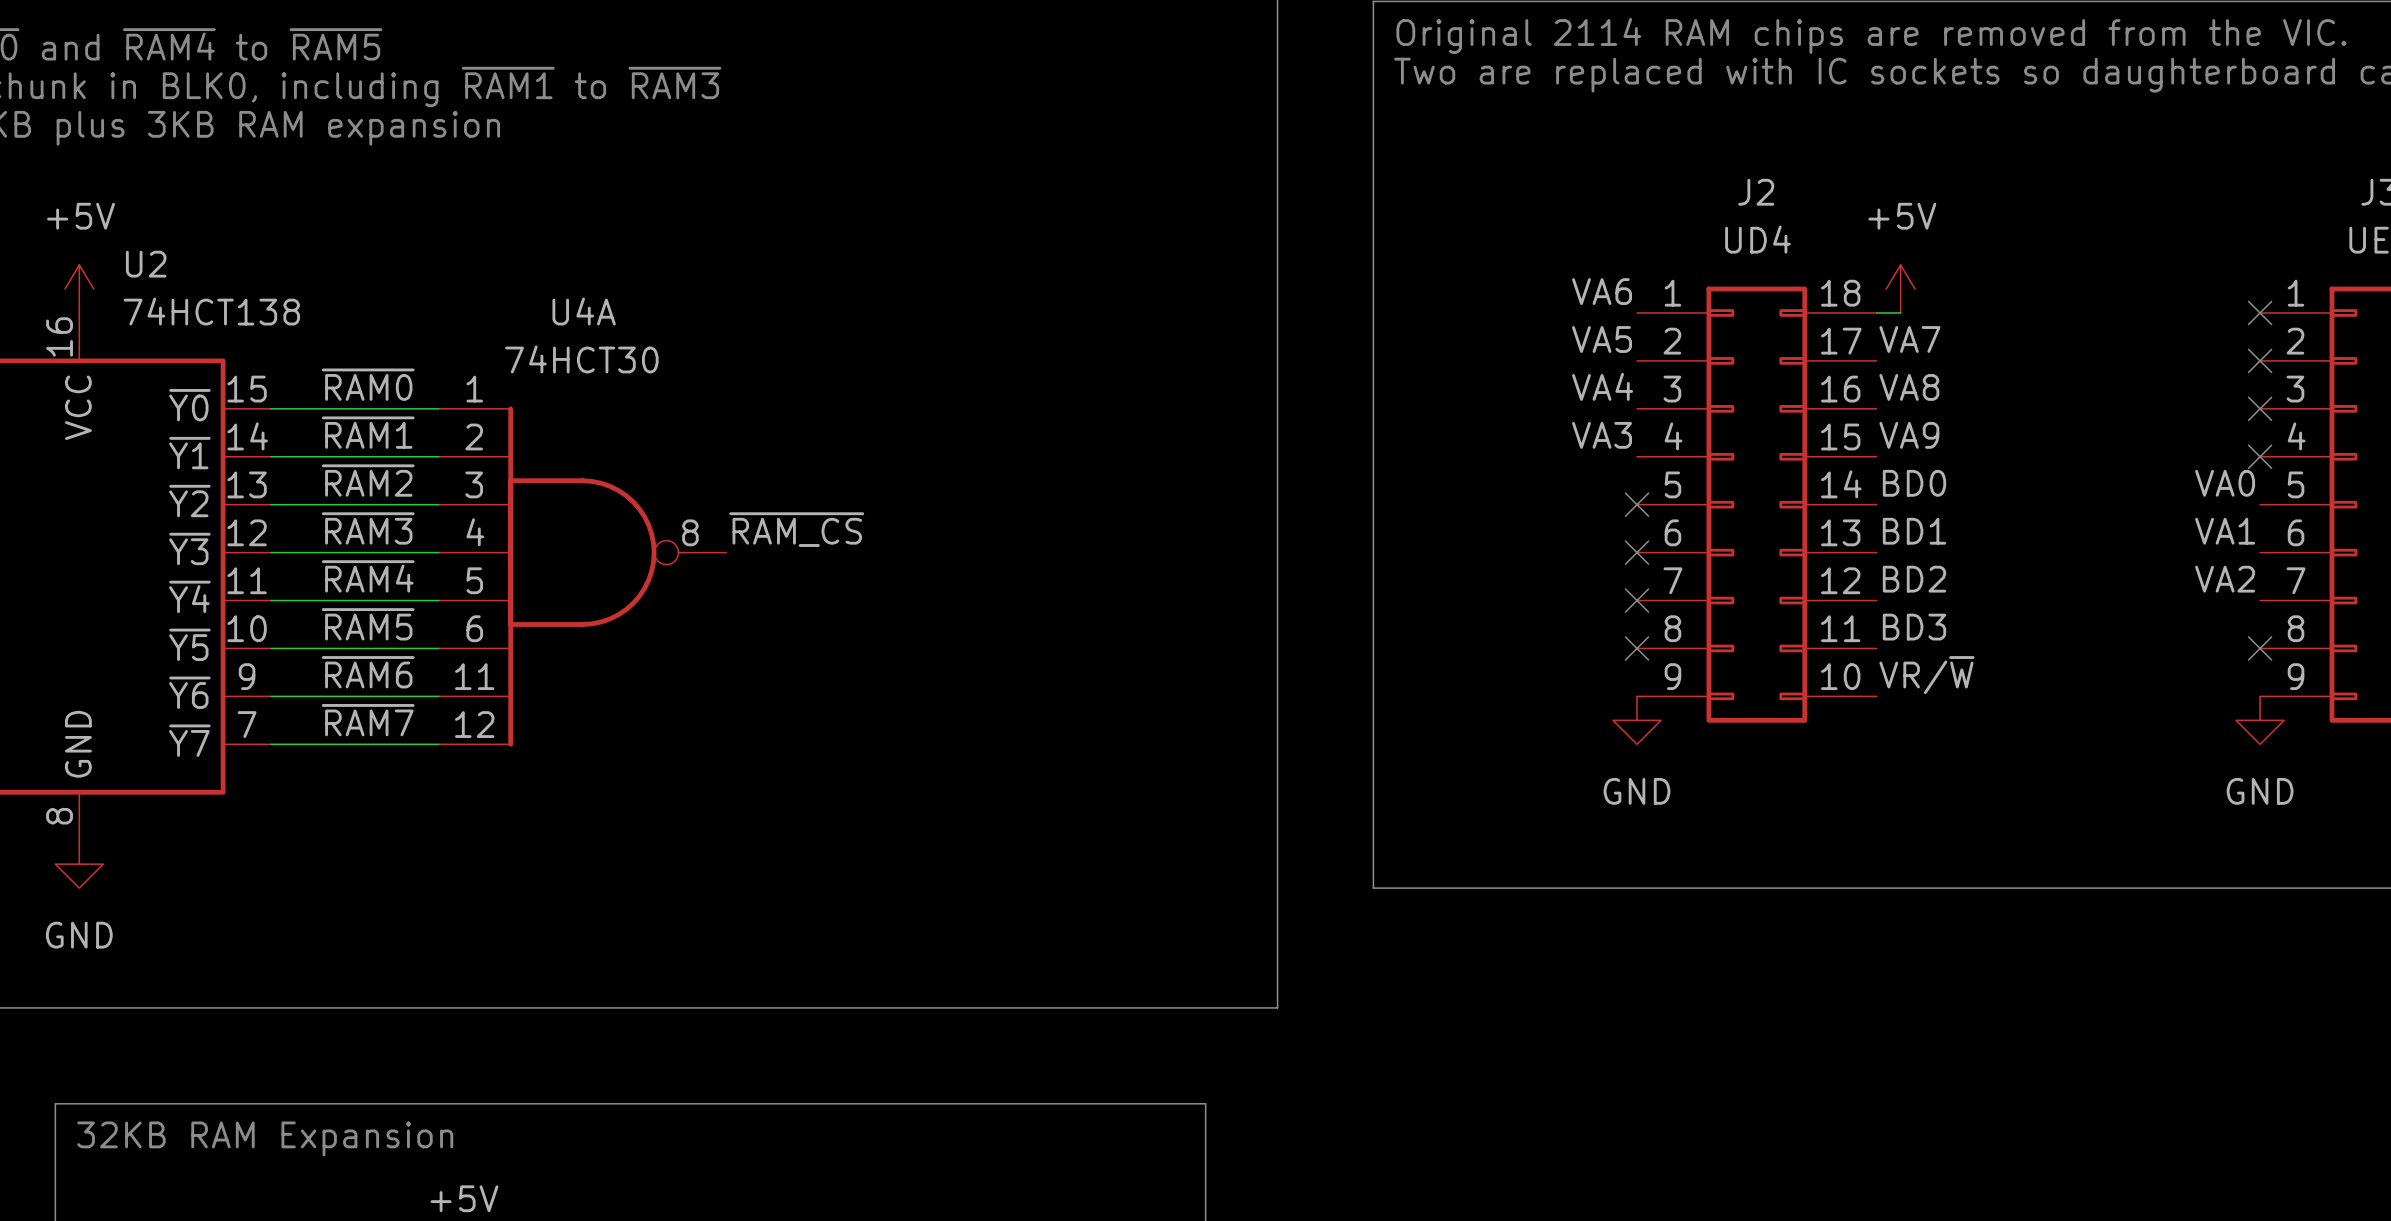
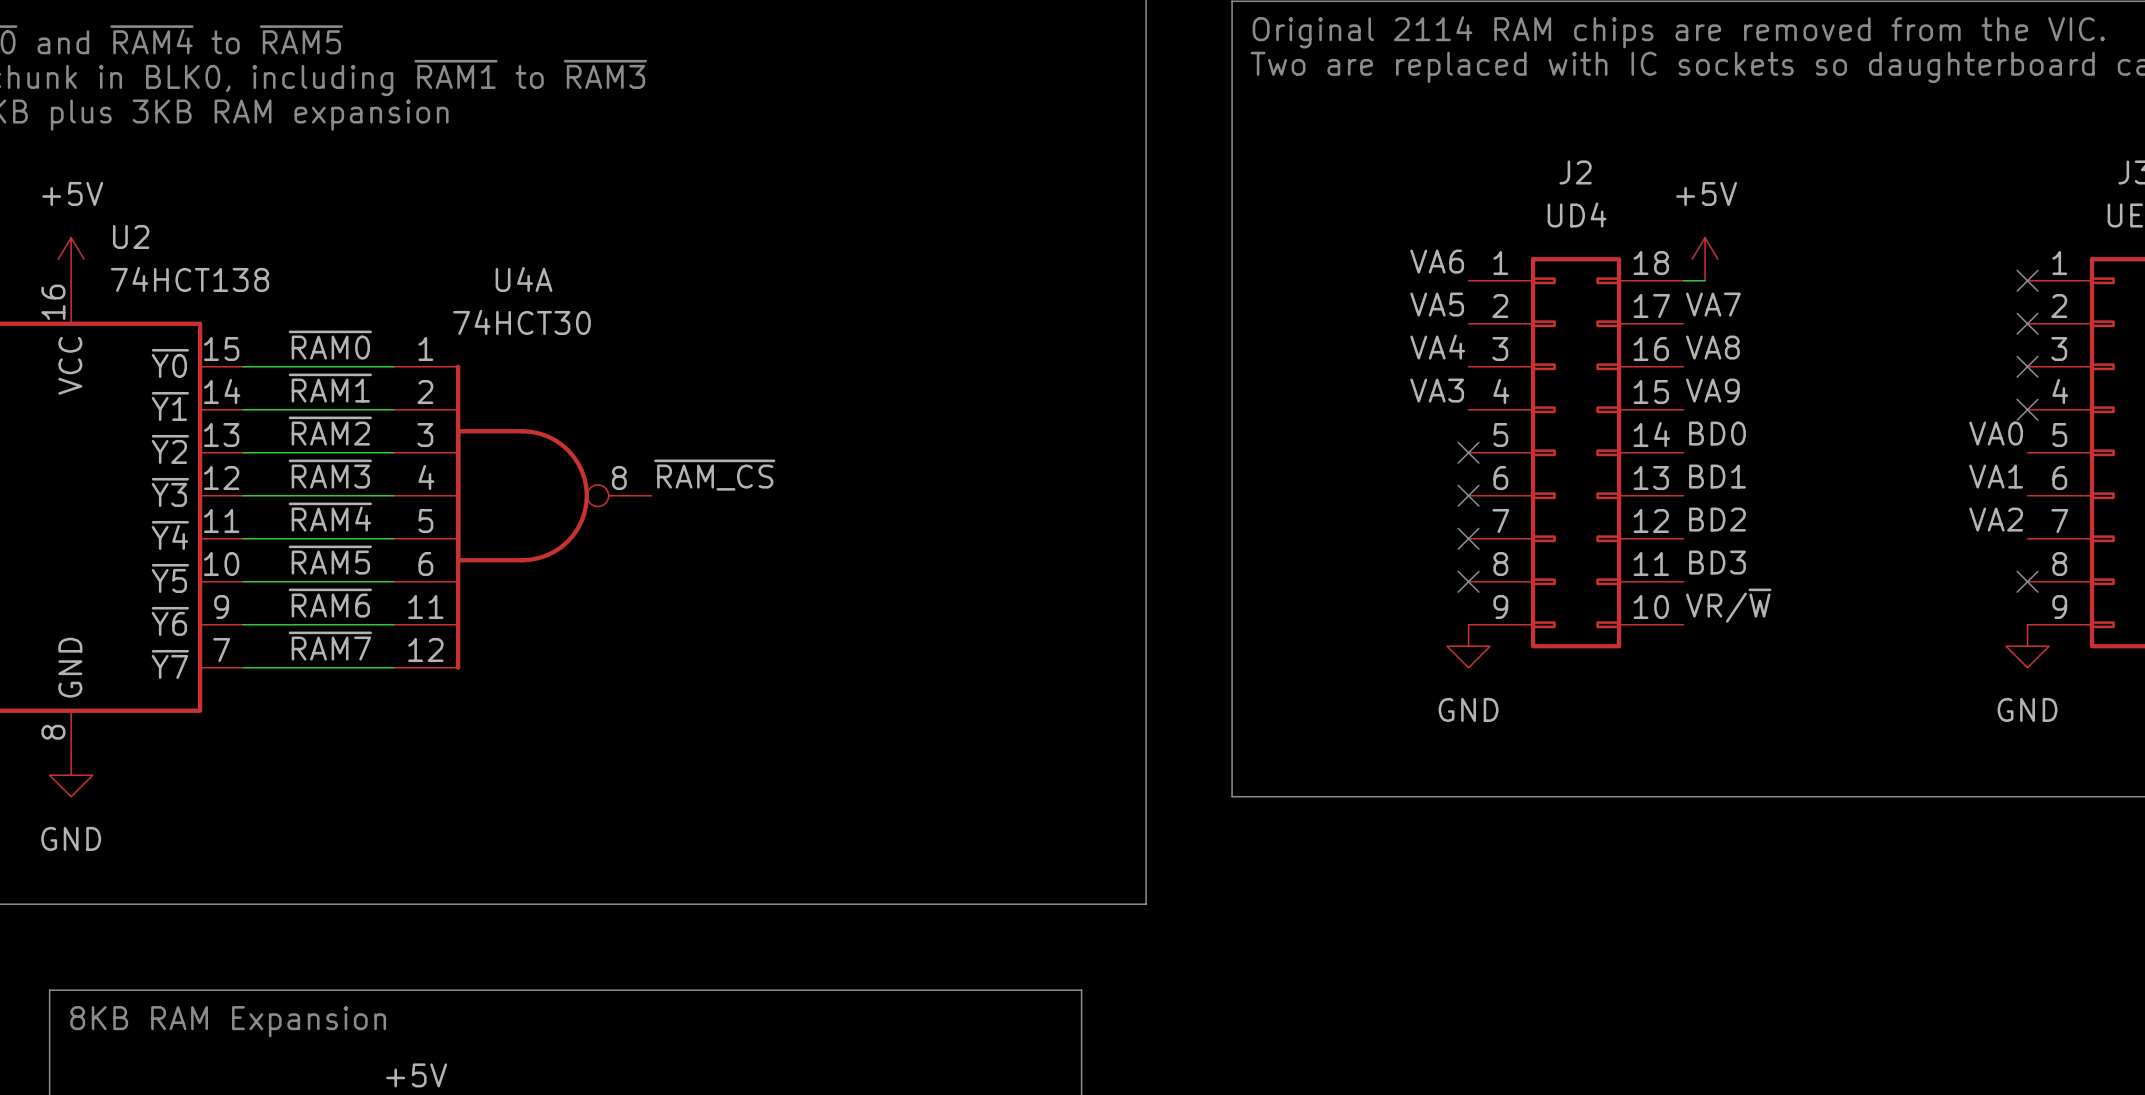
text: 32KB RAM Expansion (265, 1138) -> 8KB RAM Expansion (228, 1021)

